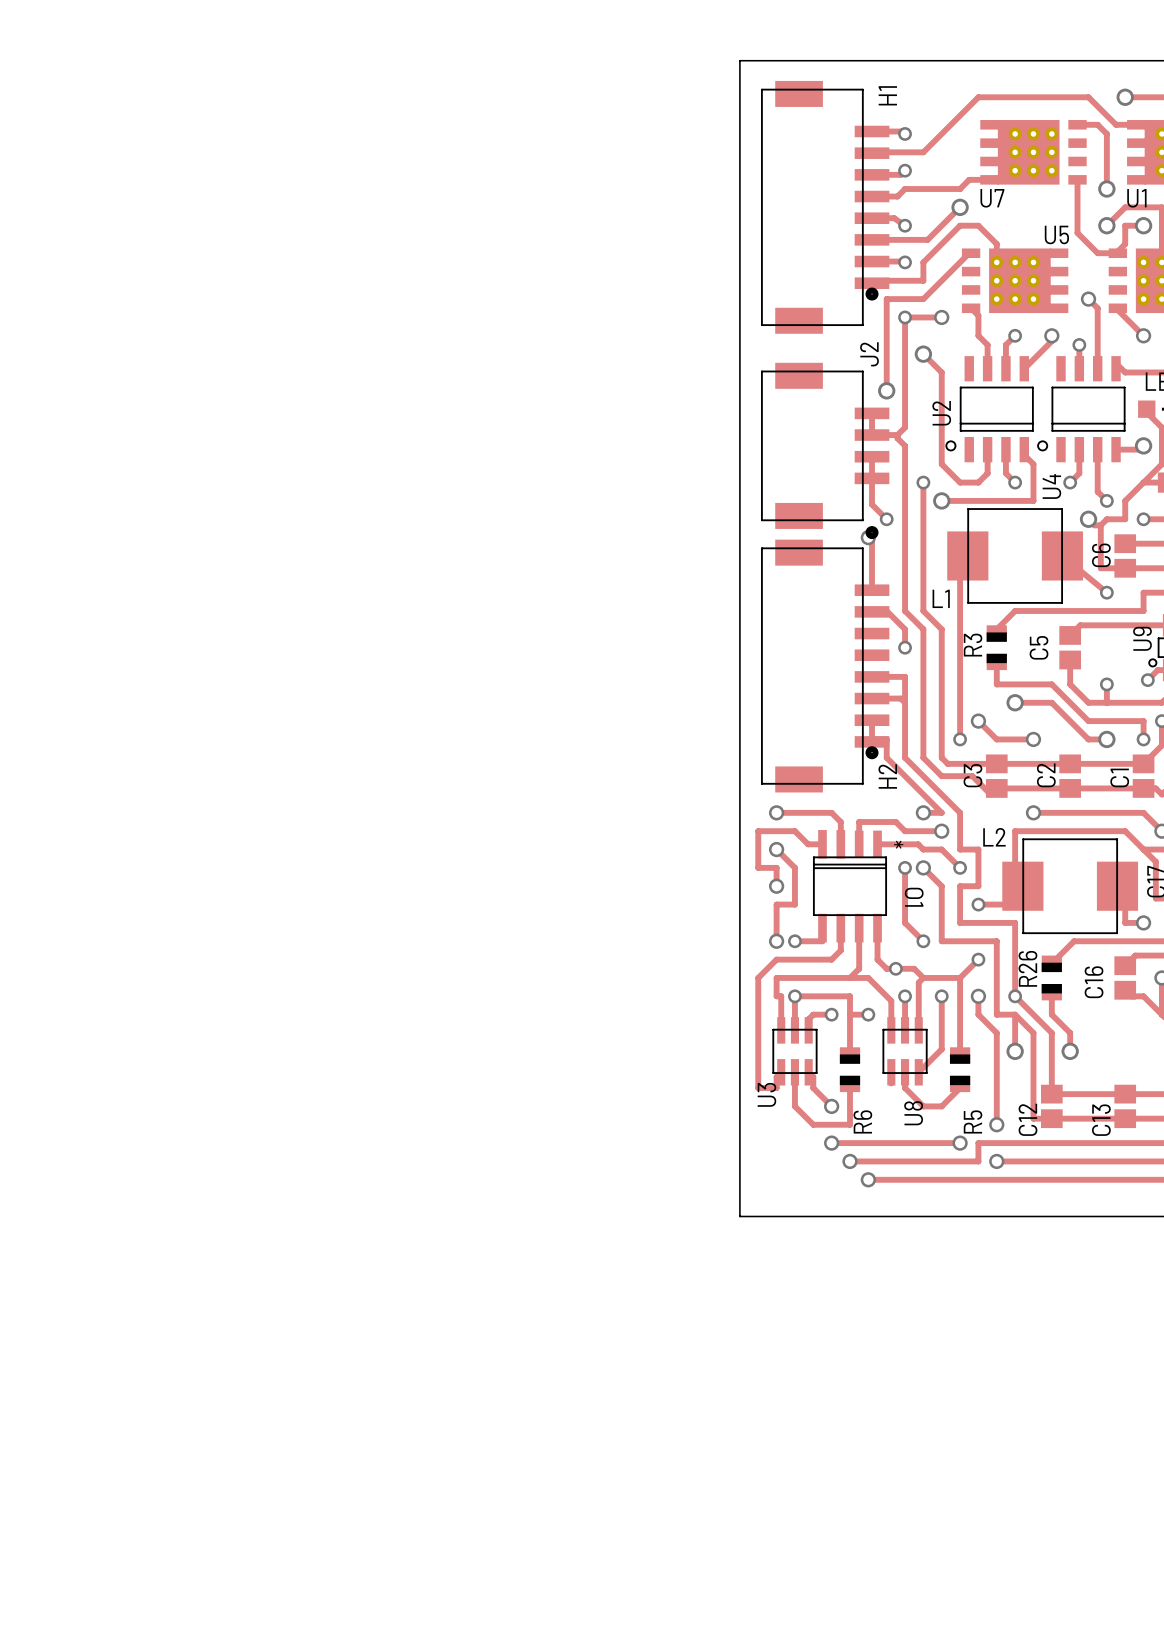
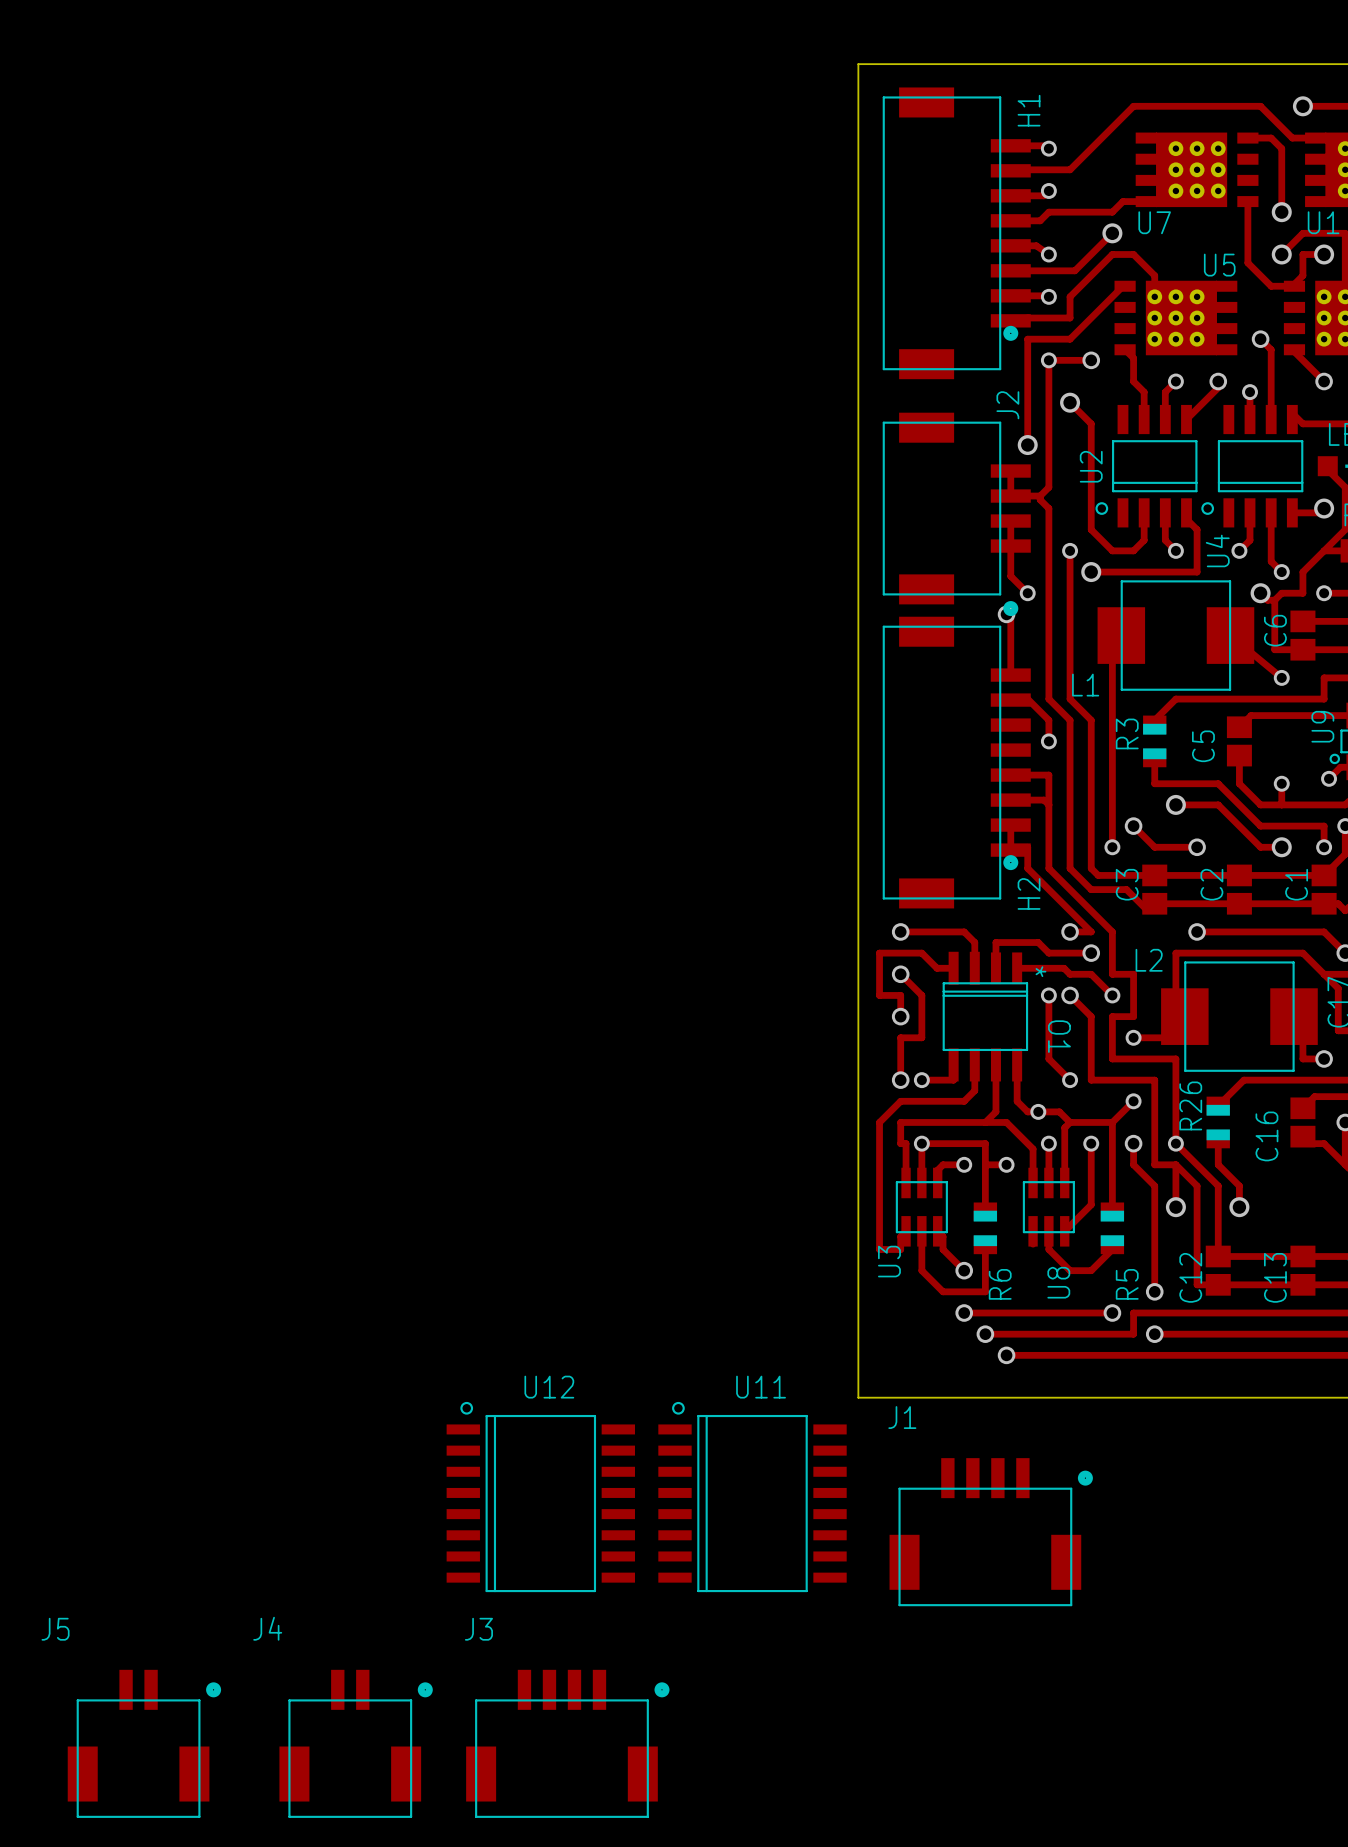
U12: none -> (540, 1497)
U11: none -> (752, 1497)
J1: none -> (991, 1532)
J5: none -> (144, 1743)
J4: none -> (356, 1743)
J3: none -> (567, 1743)

